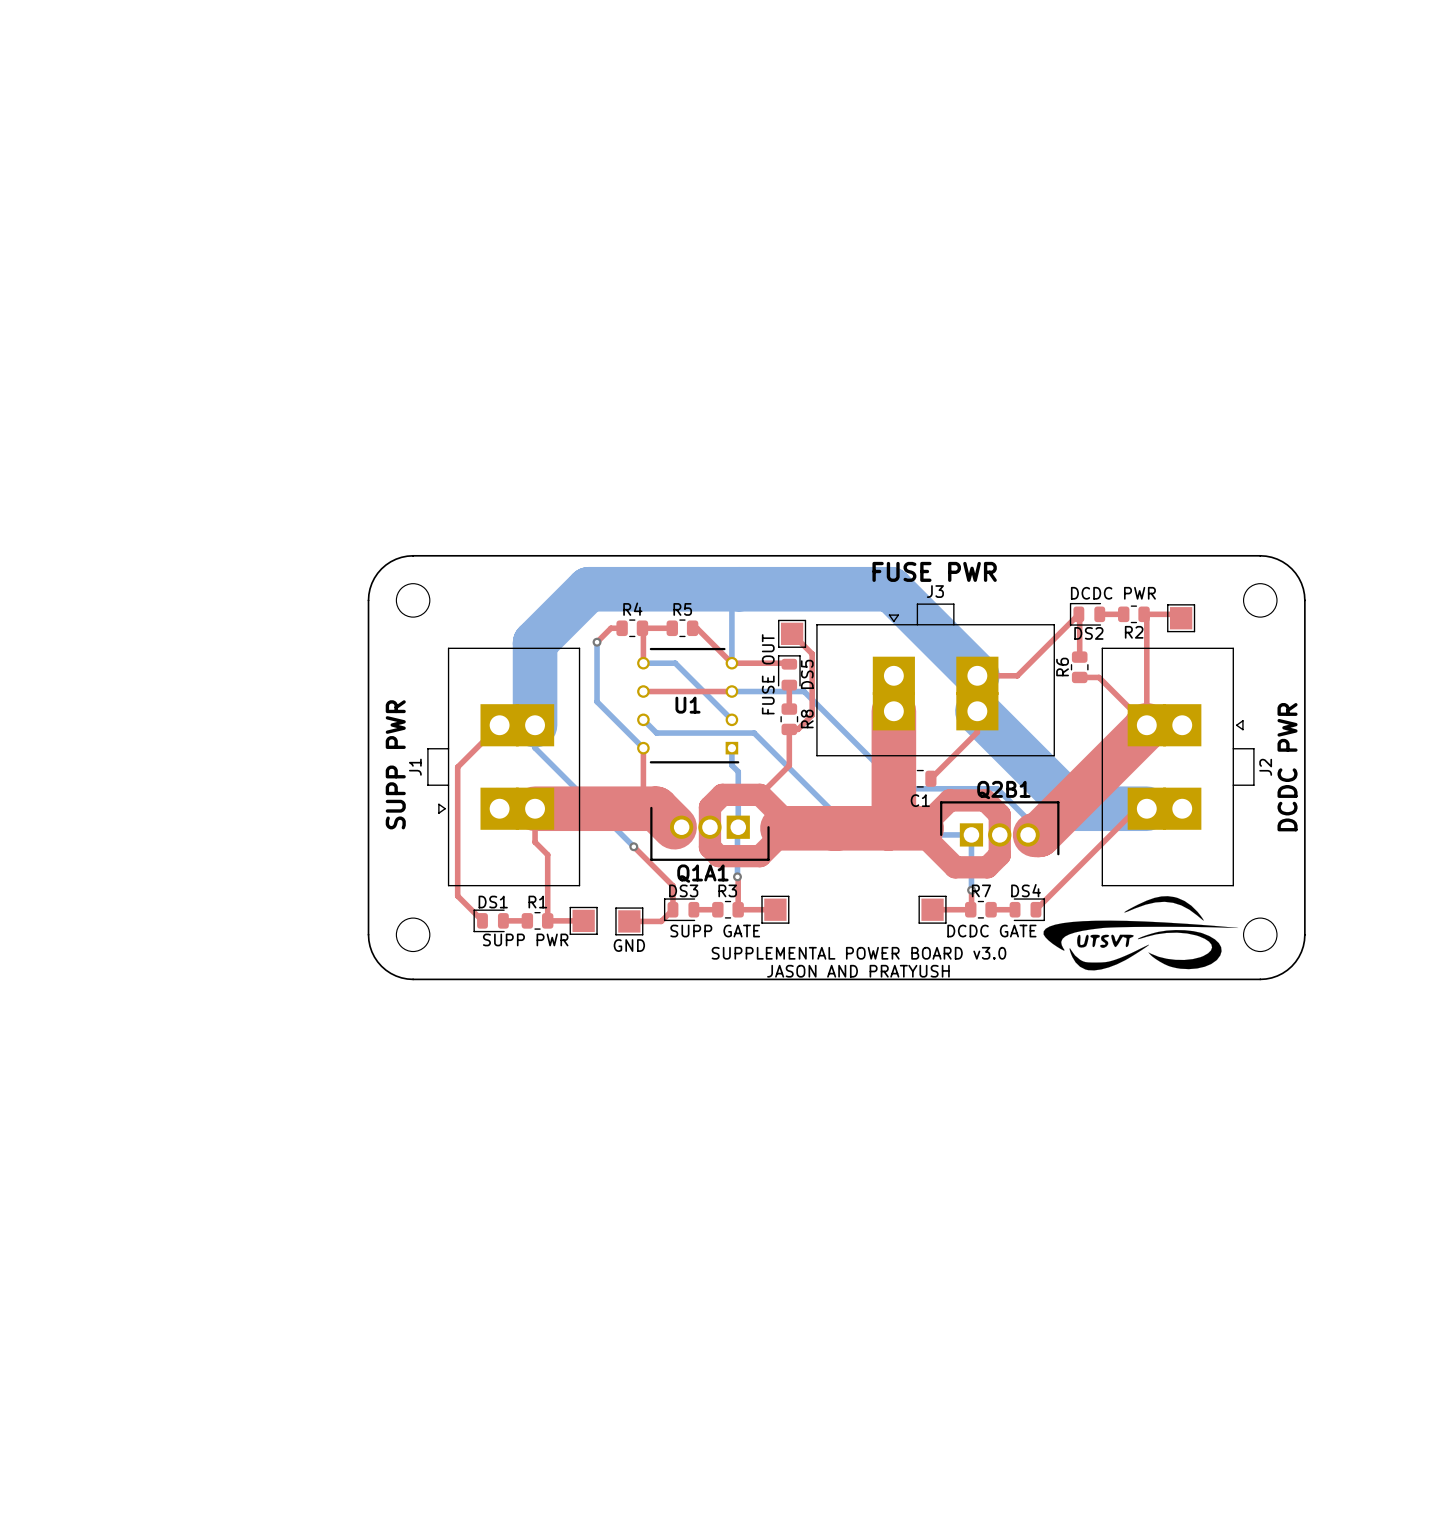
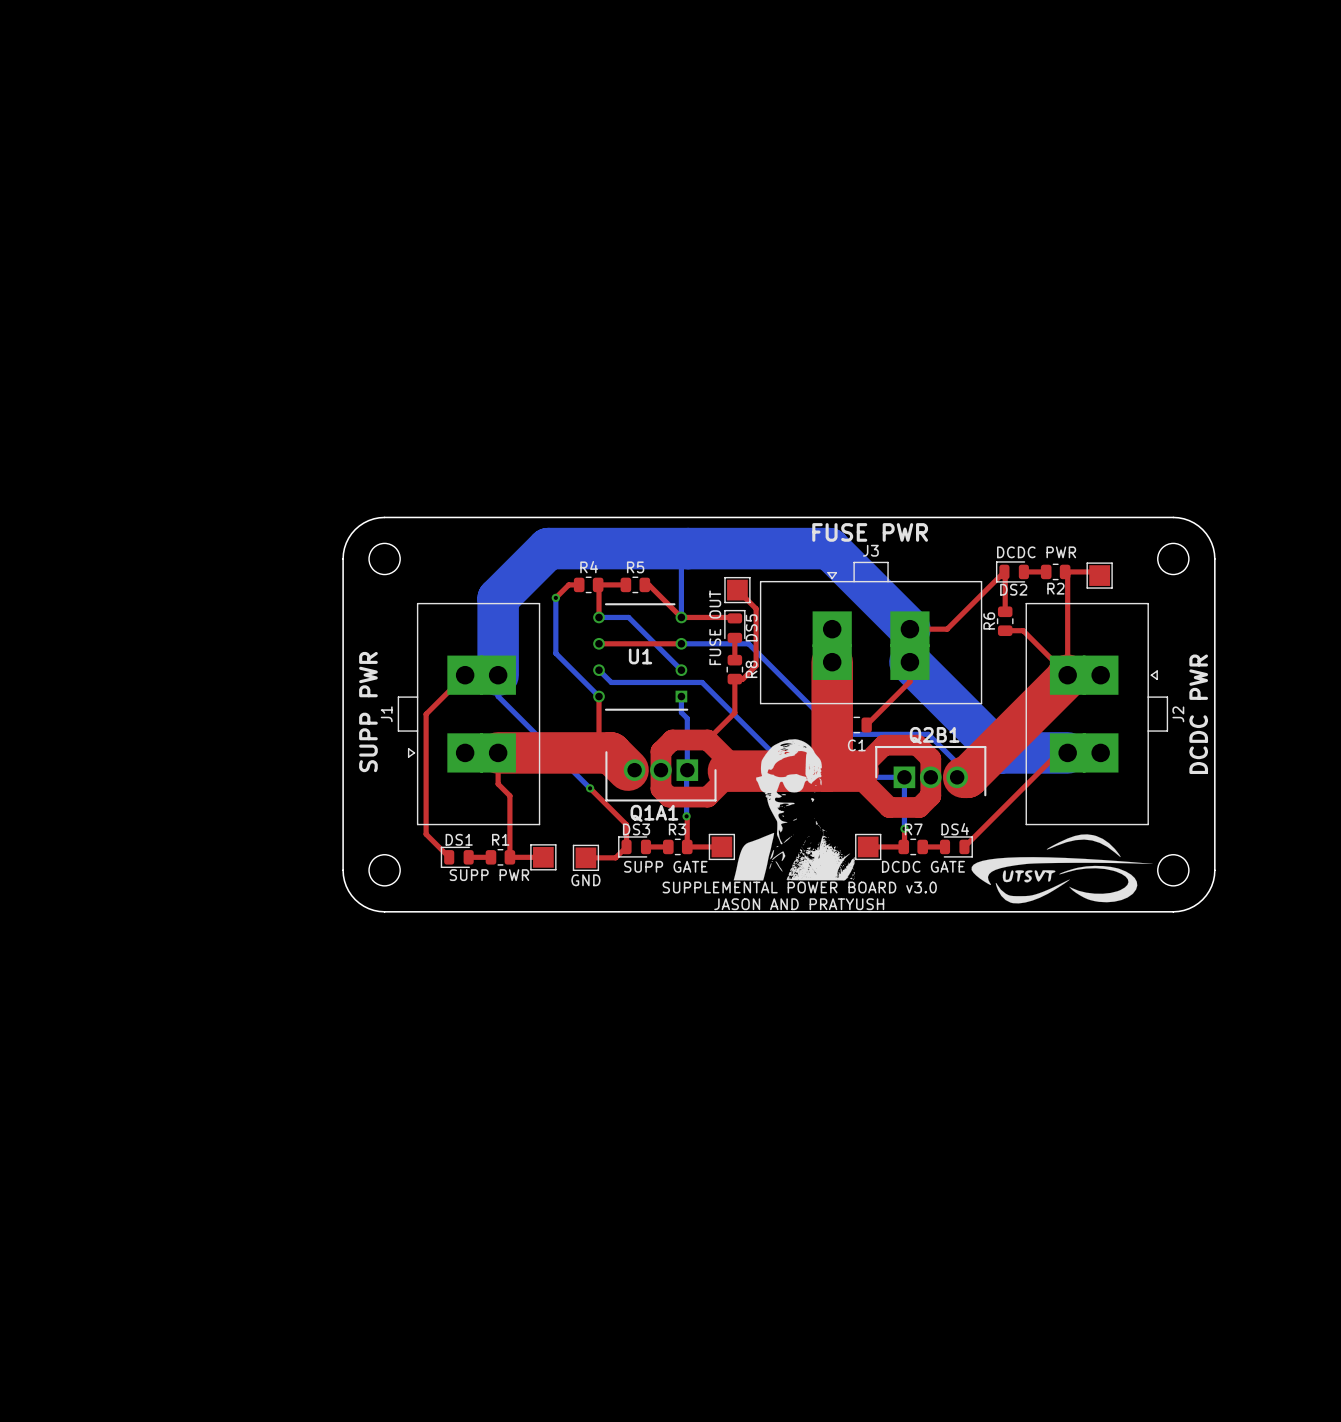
drawing: none -> [733, 739, 855, 881]

